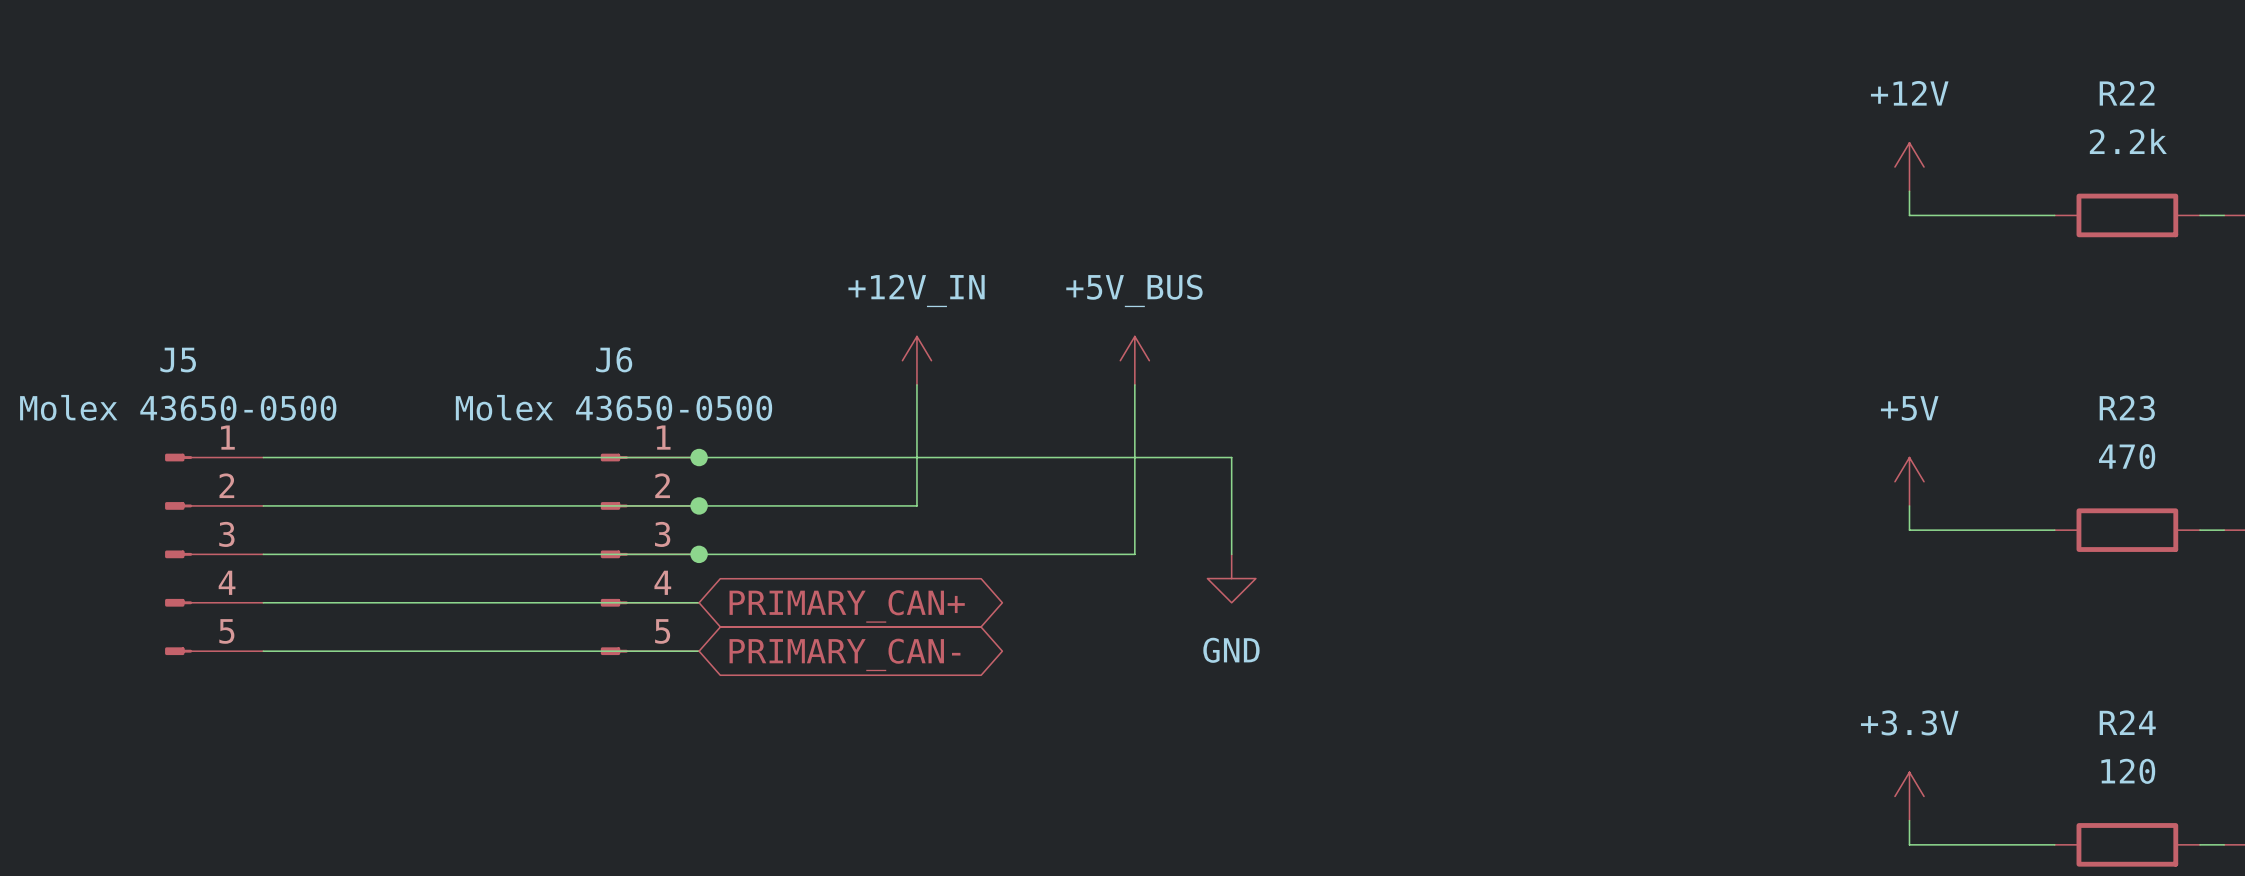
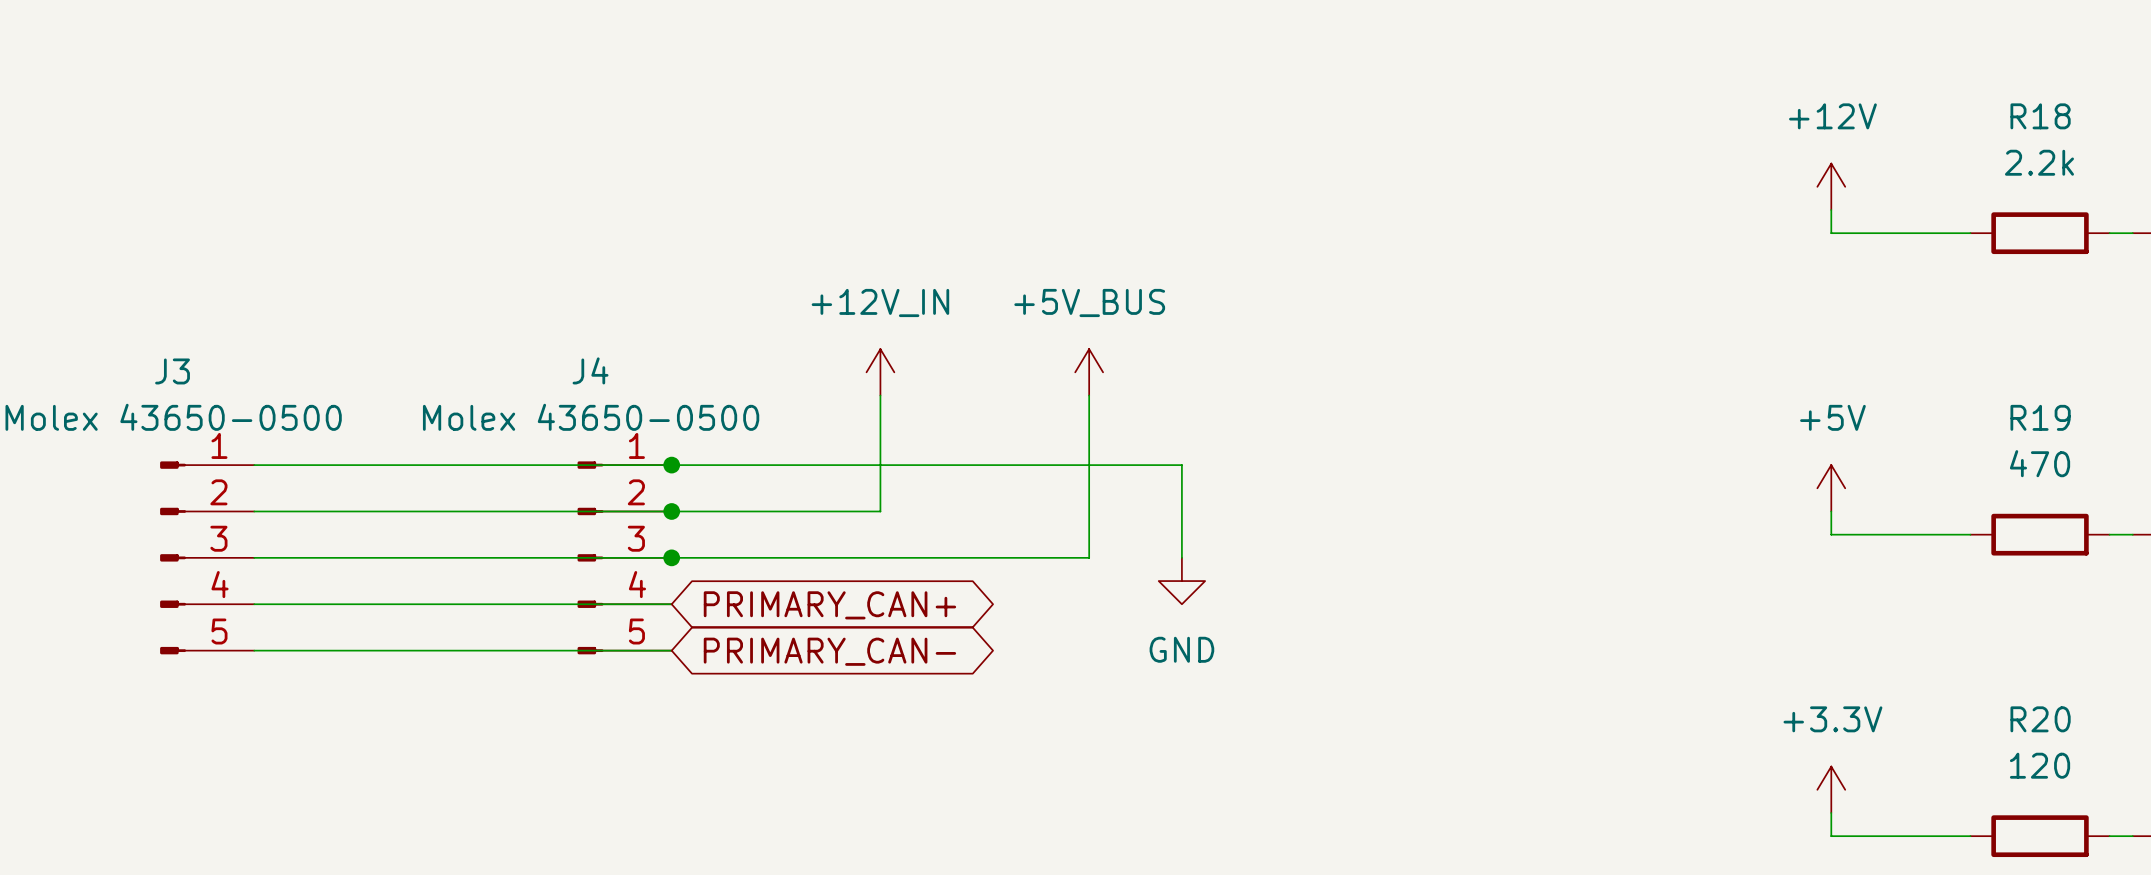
R22 name: R22 (2127, 93) -> R18 (2040, 116)
J6 name: J6 (614, 359) -> J4 (590, 370)
J5 name: J5 (178, 360) -> J3 (172, 371)
R23 name: R23 (2127, 408) -> R19 (2040, 417)
R24 name: R24 (2127, 722) -> R20 (2040, 719)

